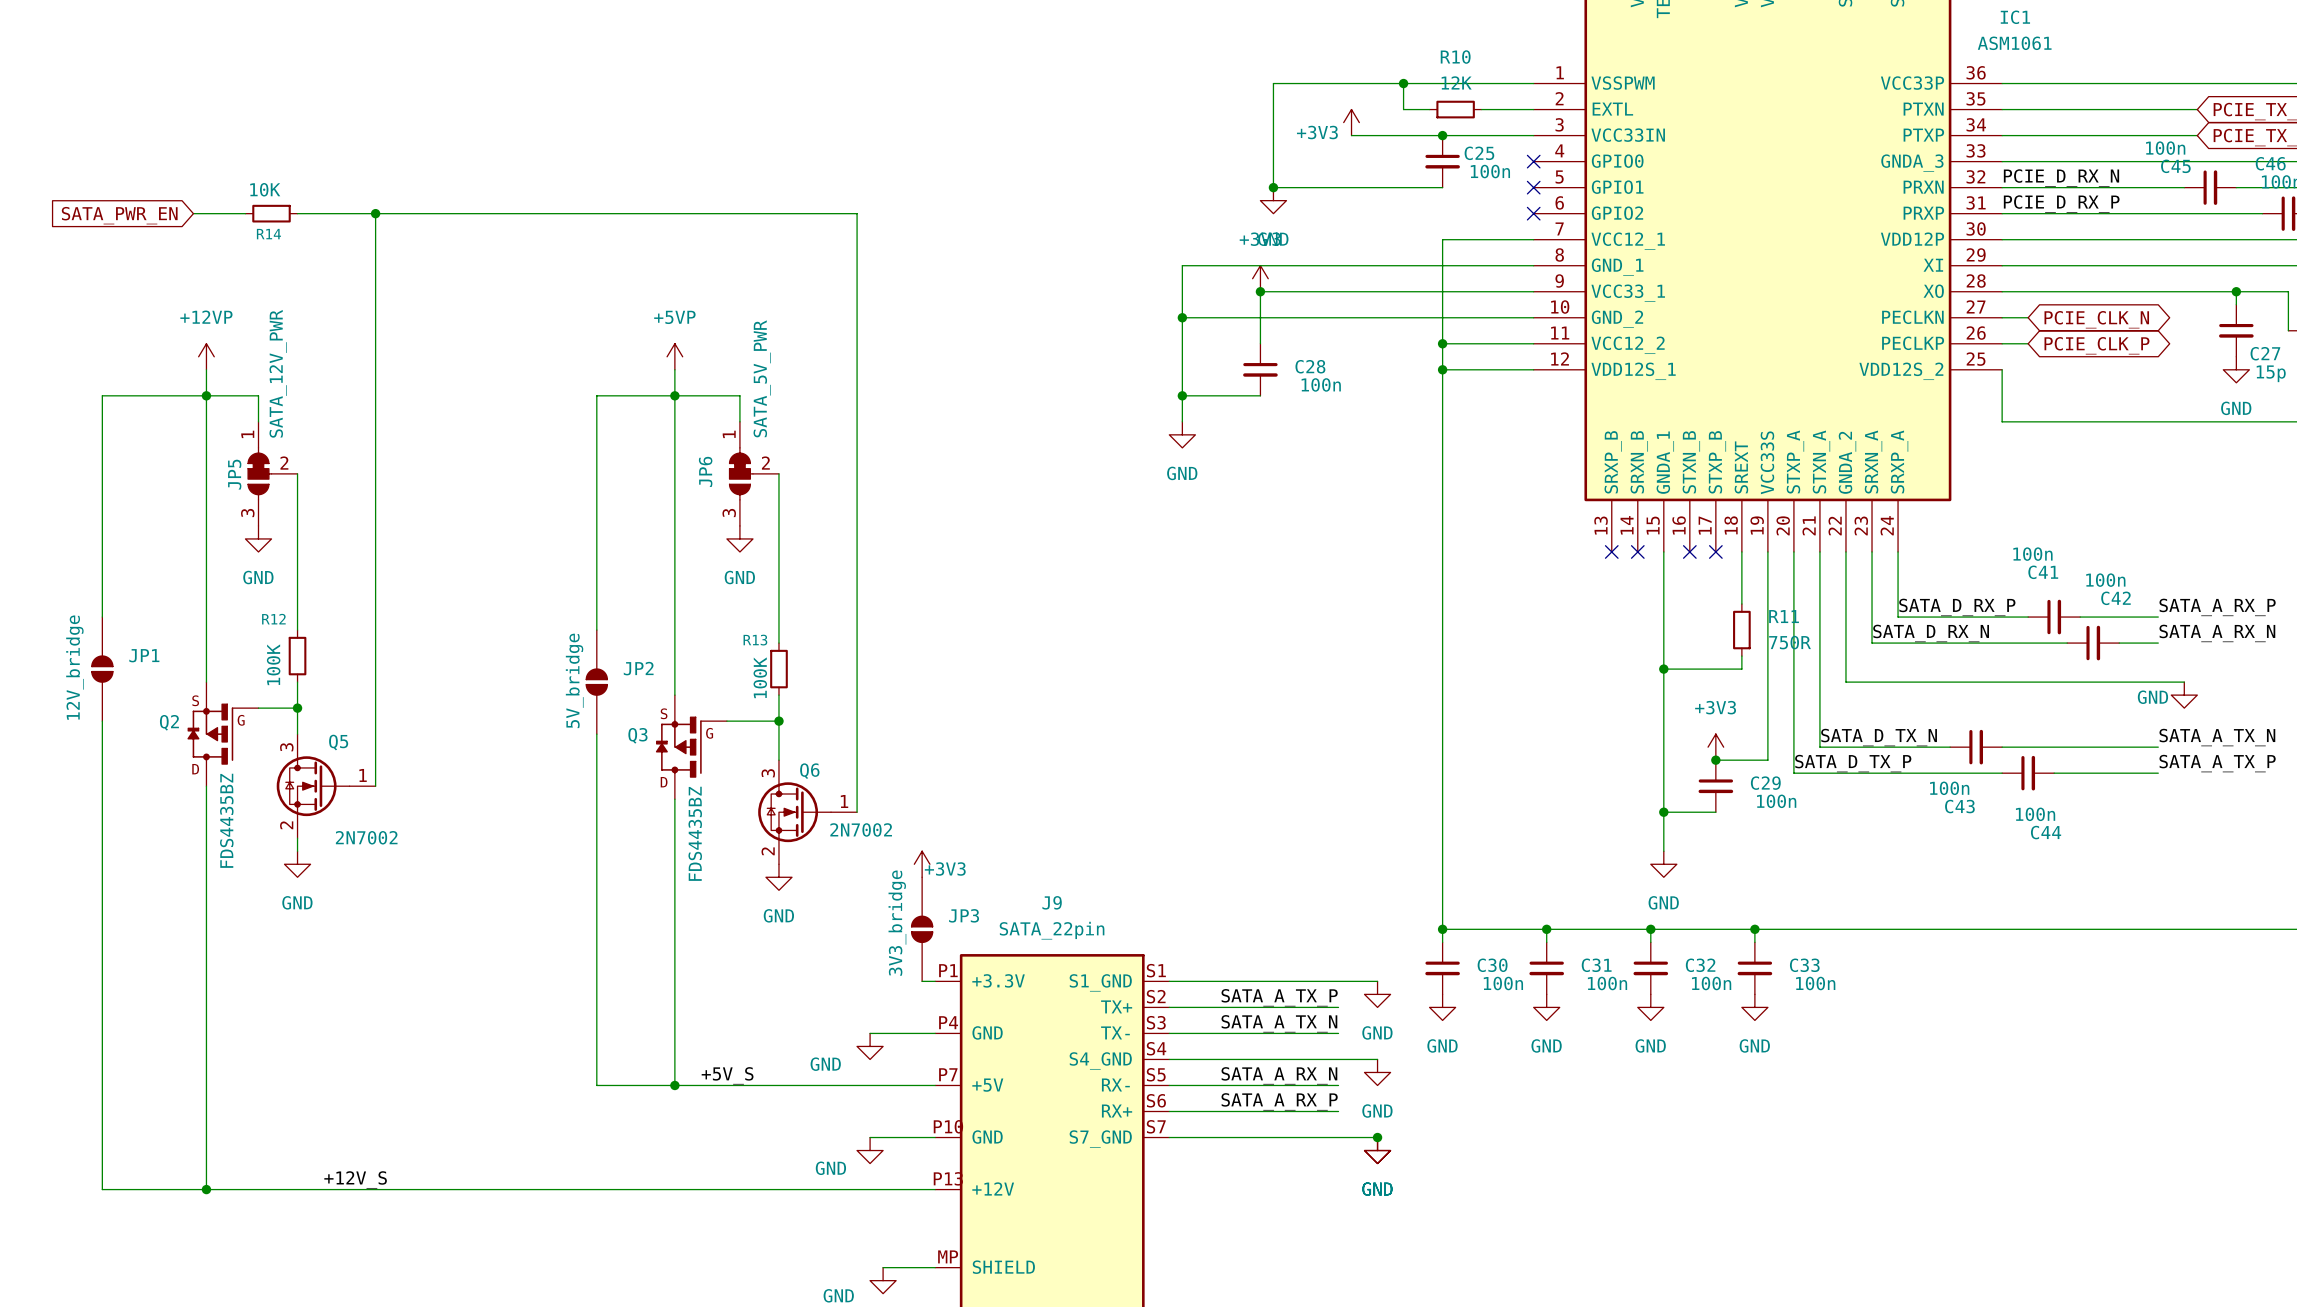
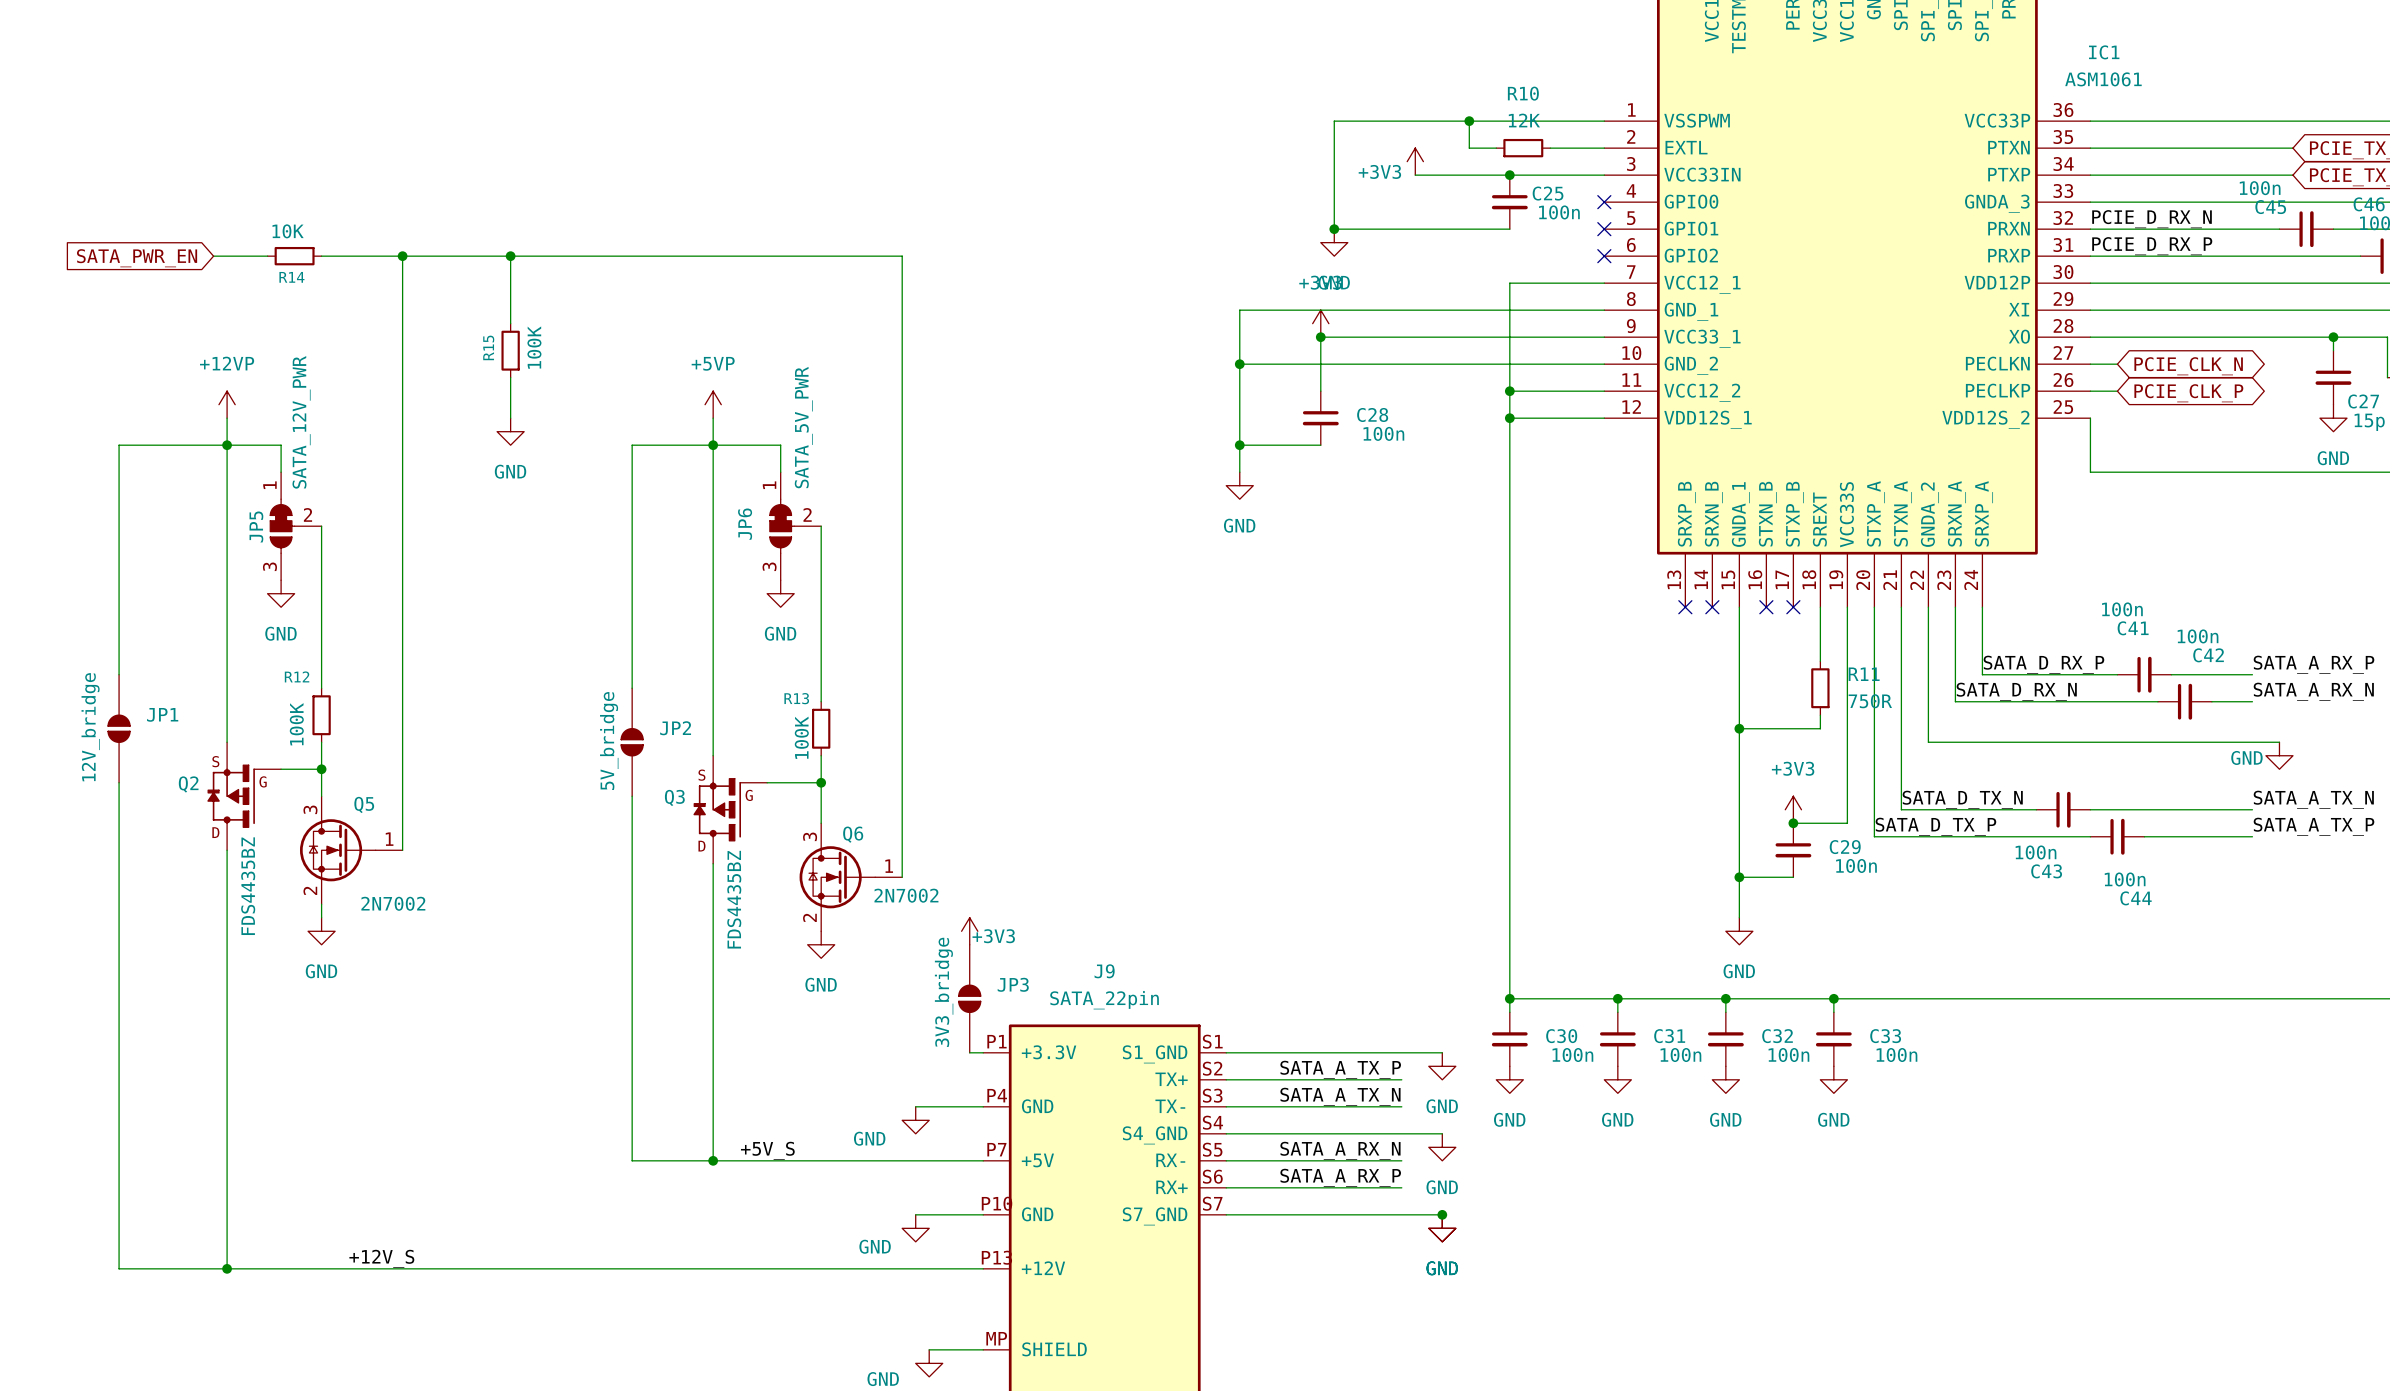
wire: none -> (510, 256) (510, 323)
junction: none -> (510, 256)
R15: none -> 100K (510, 350)
wire: none -> (510, 377) (510, 418)
power symbol: none -> GND (510, 431)

